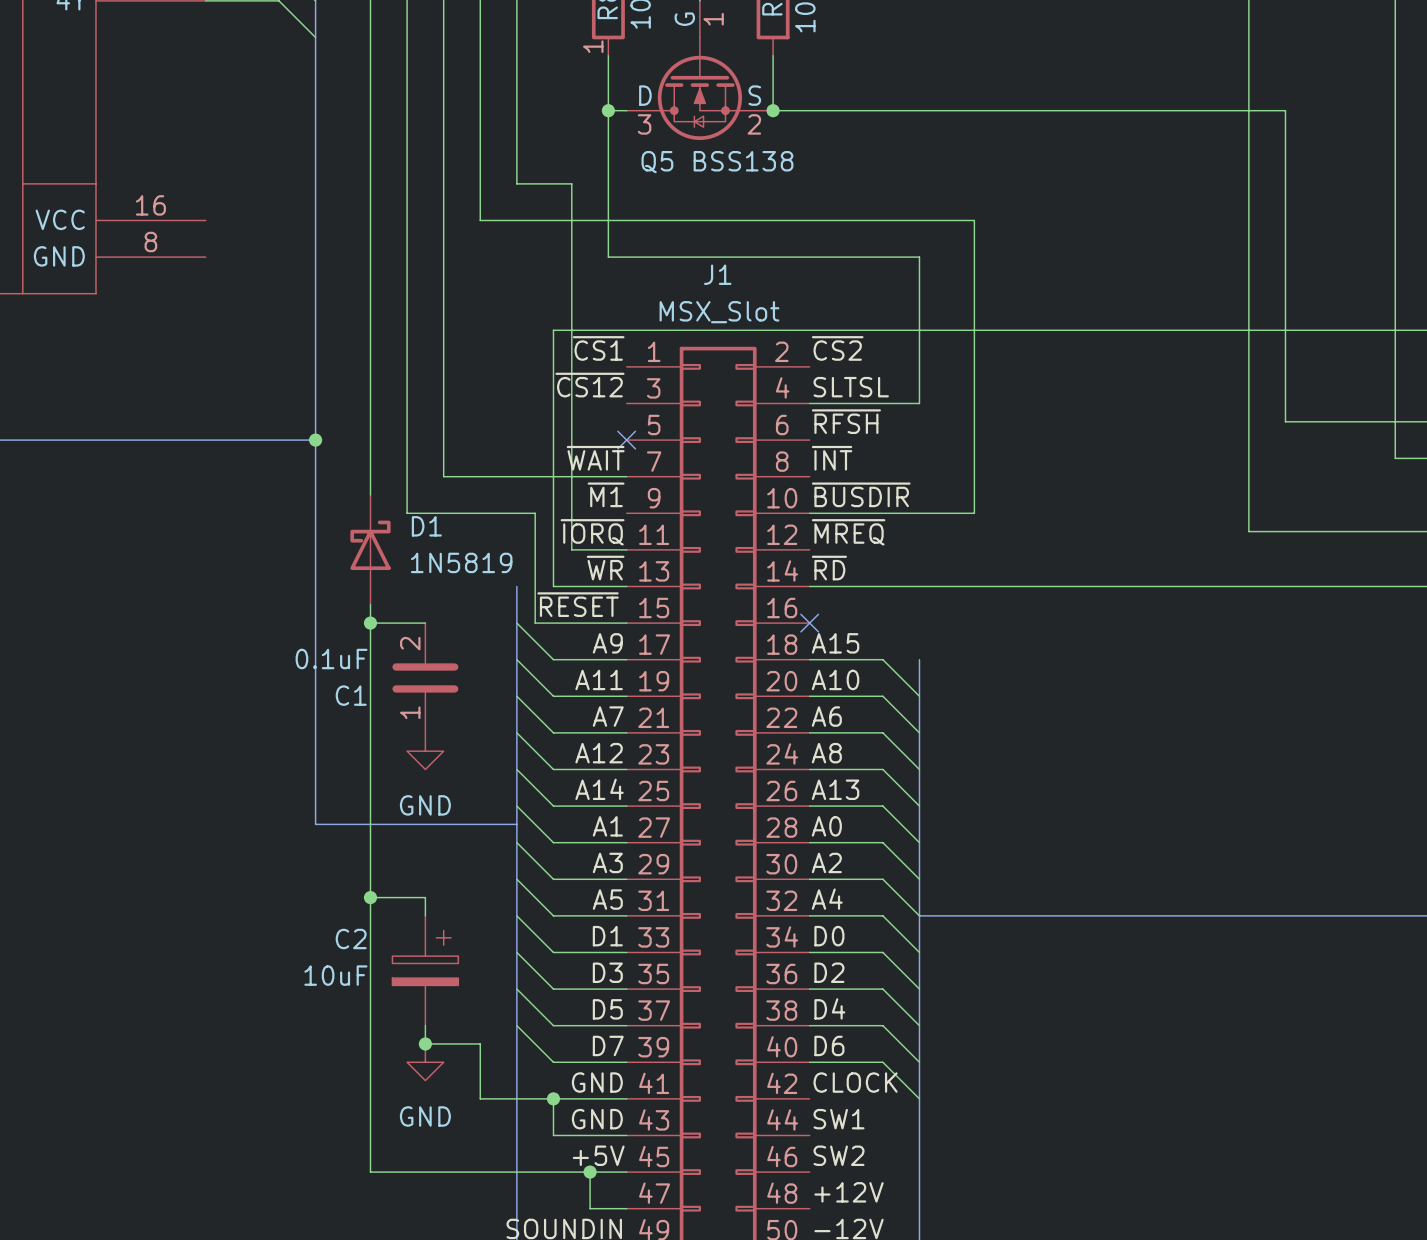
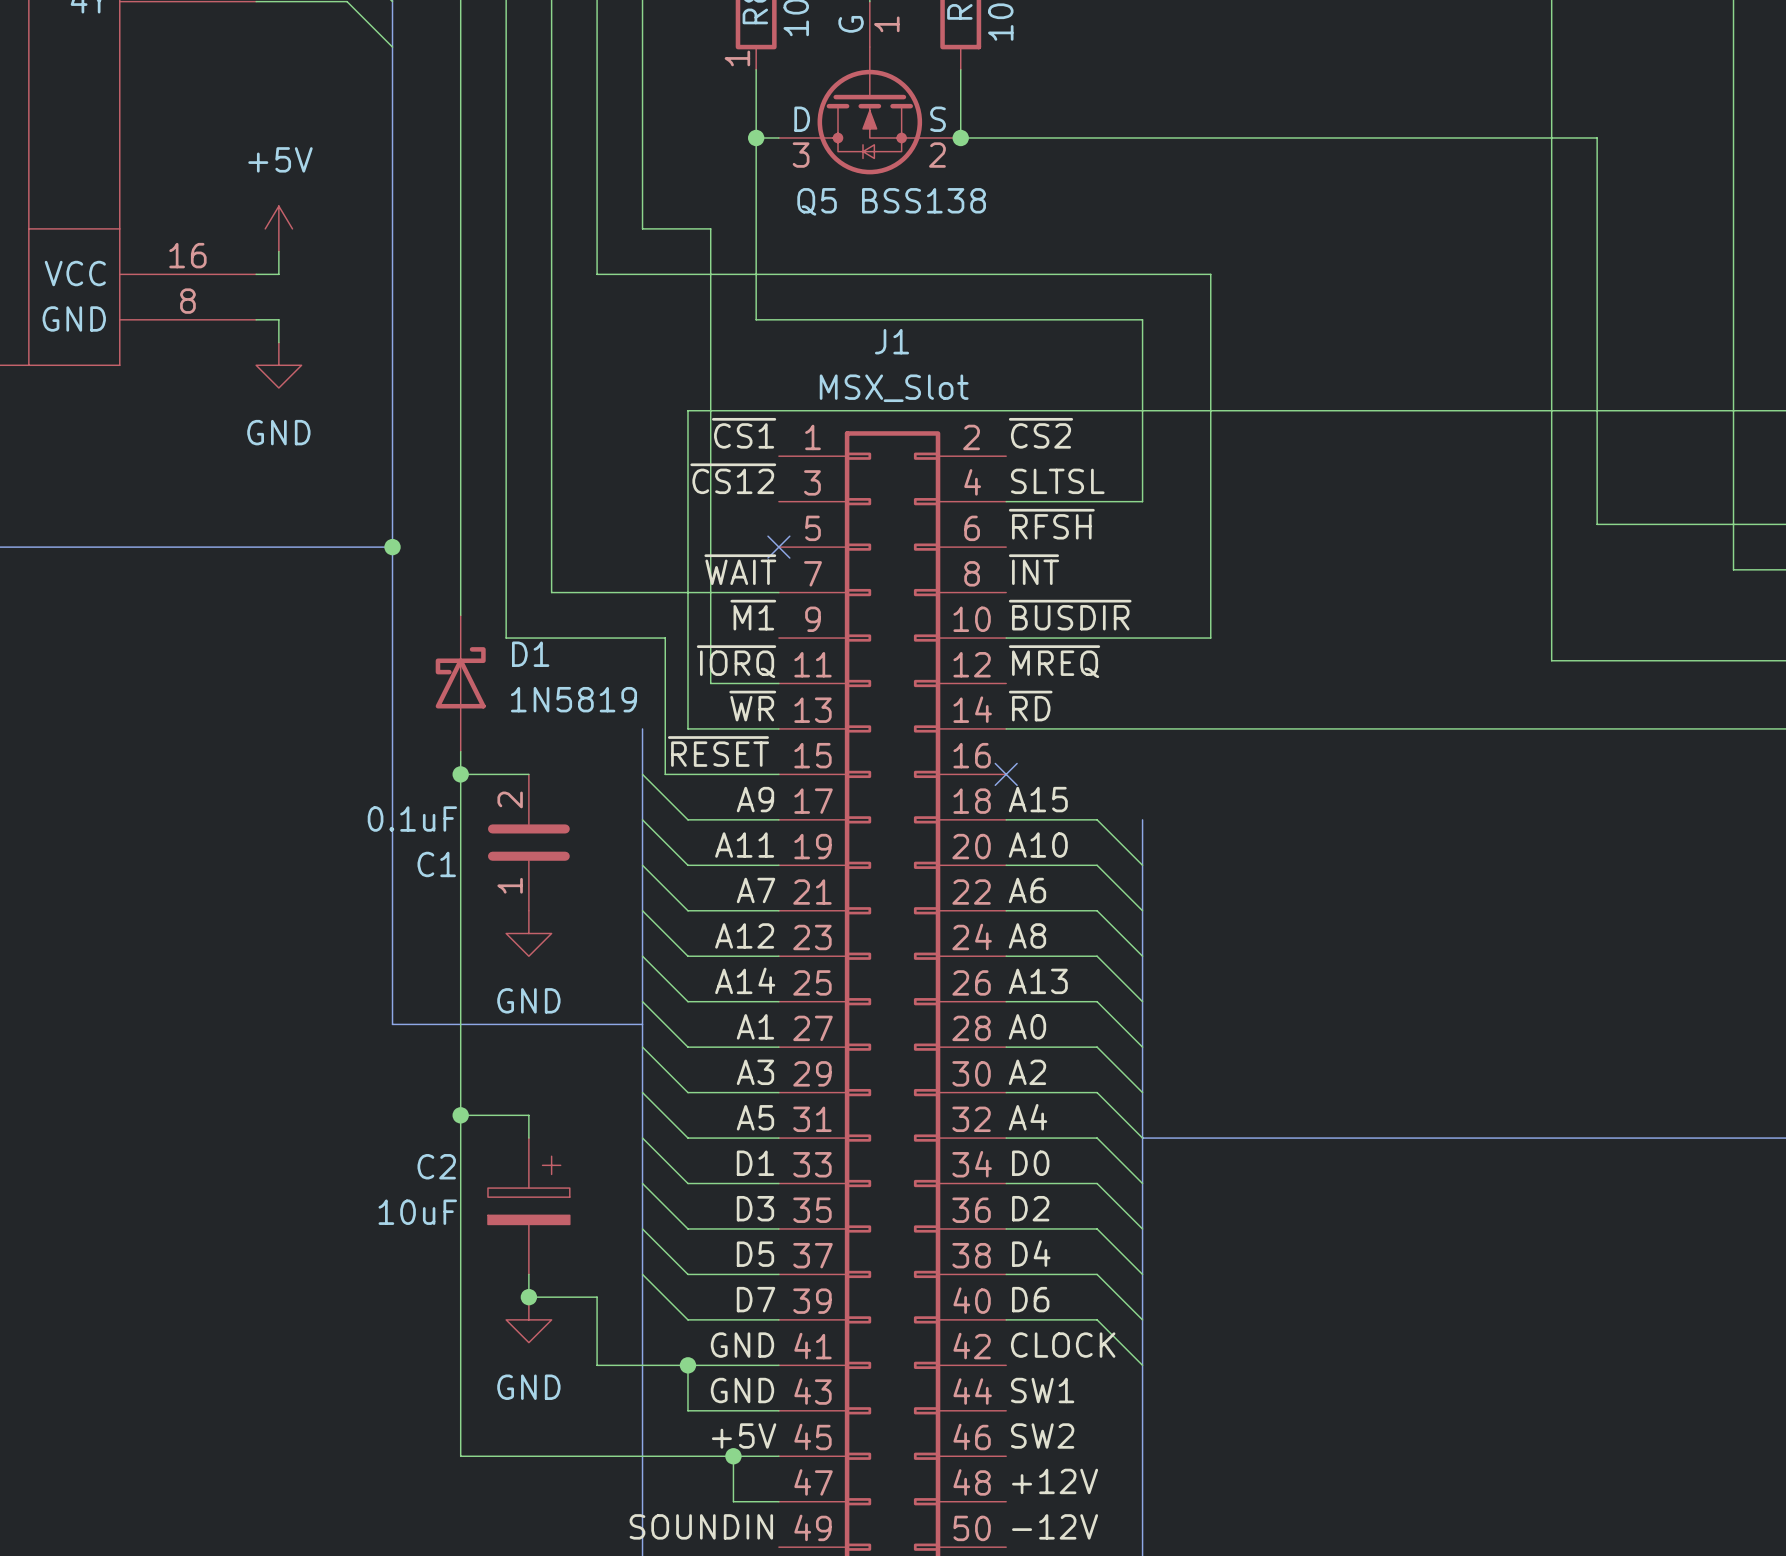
power symbol: none -> +5V (278, 228)
wire: none -> (278, 251) (278, 274) (256, 274)
wire: none -> (256, 319) (278, 319) (278, 342)
power symbol: none -> GND (278, 365)

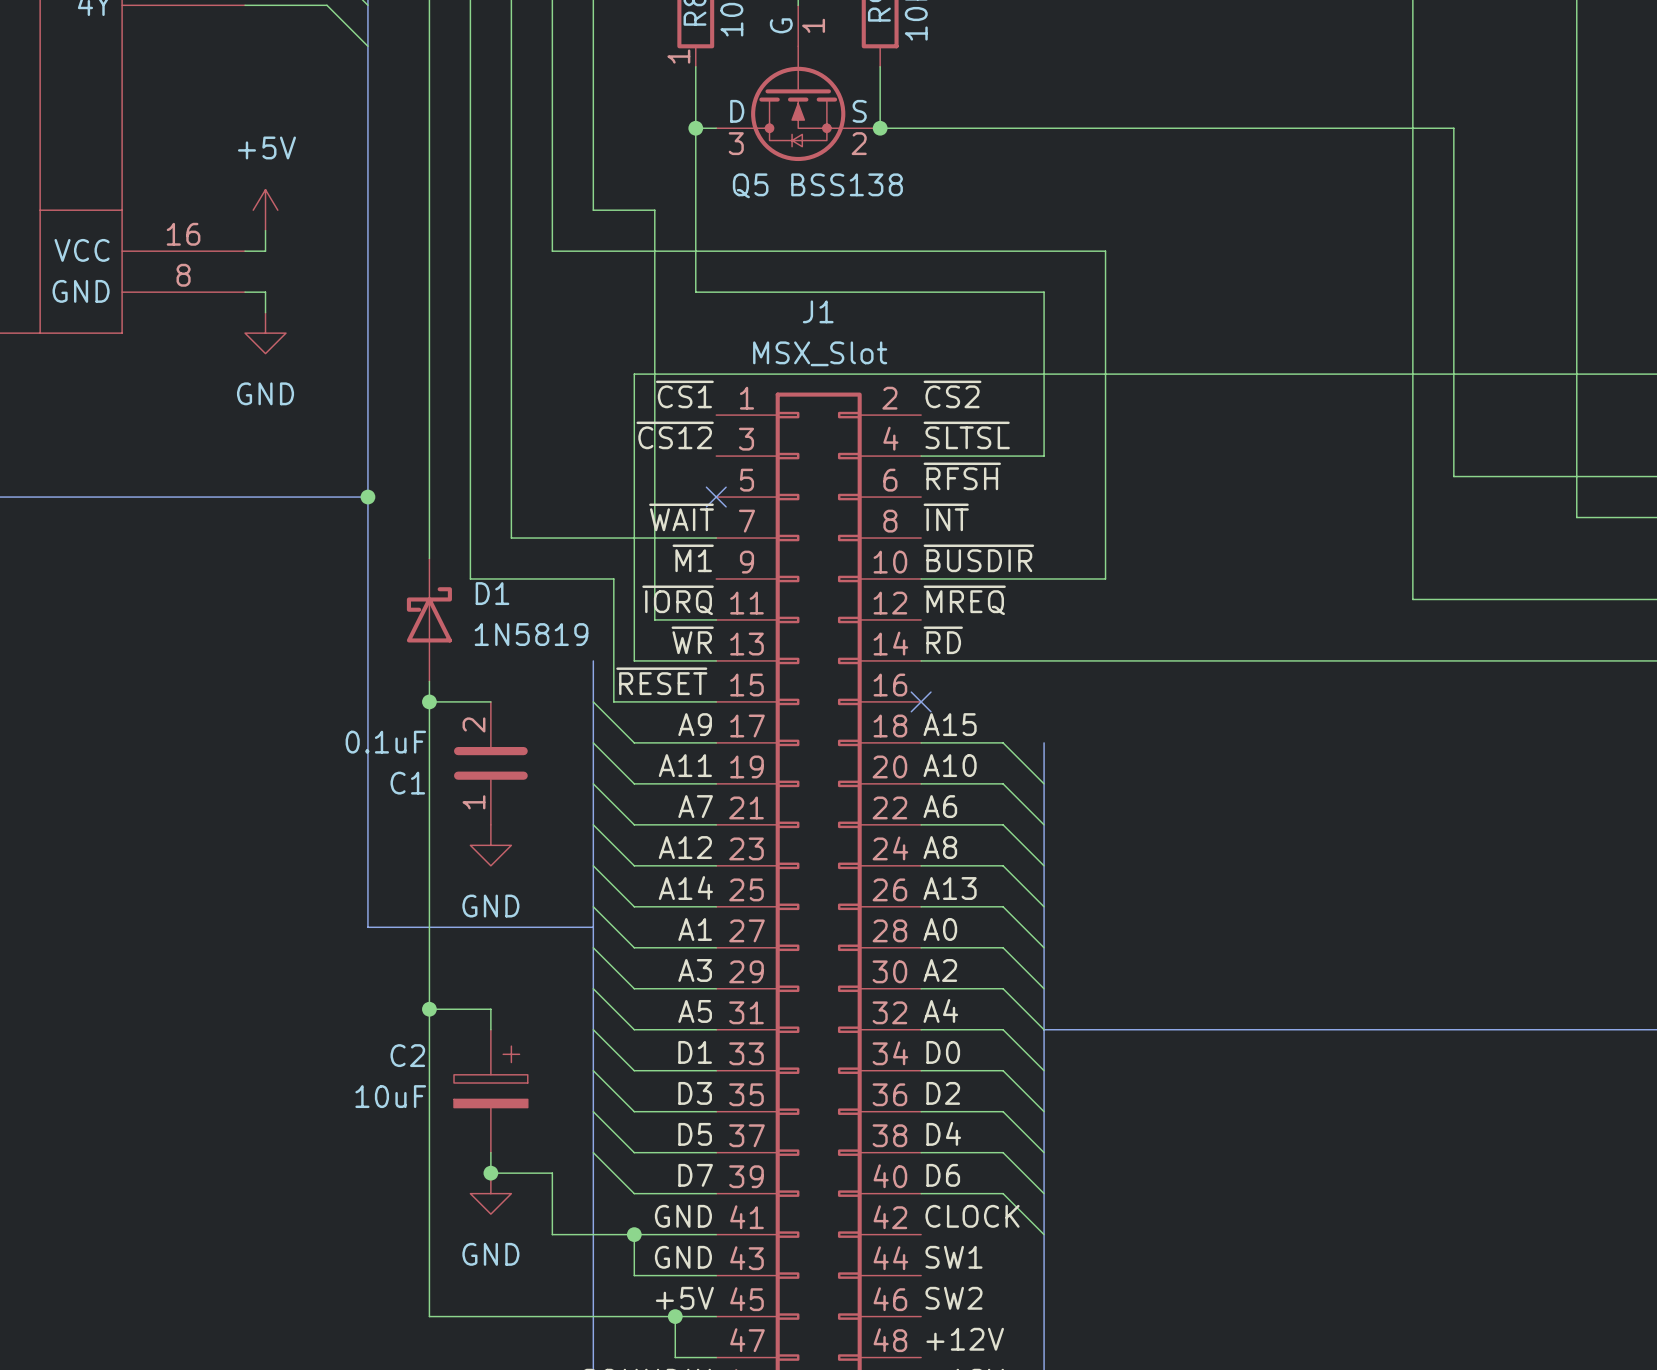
label: SLTSL (1057, 481) -> ~{SLTSL} (966, 435)

